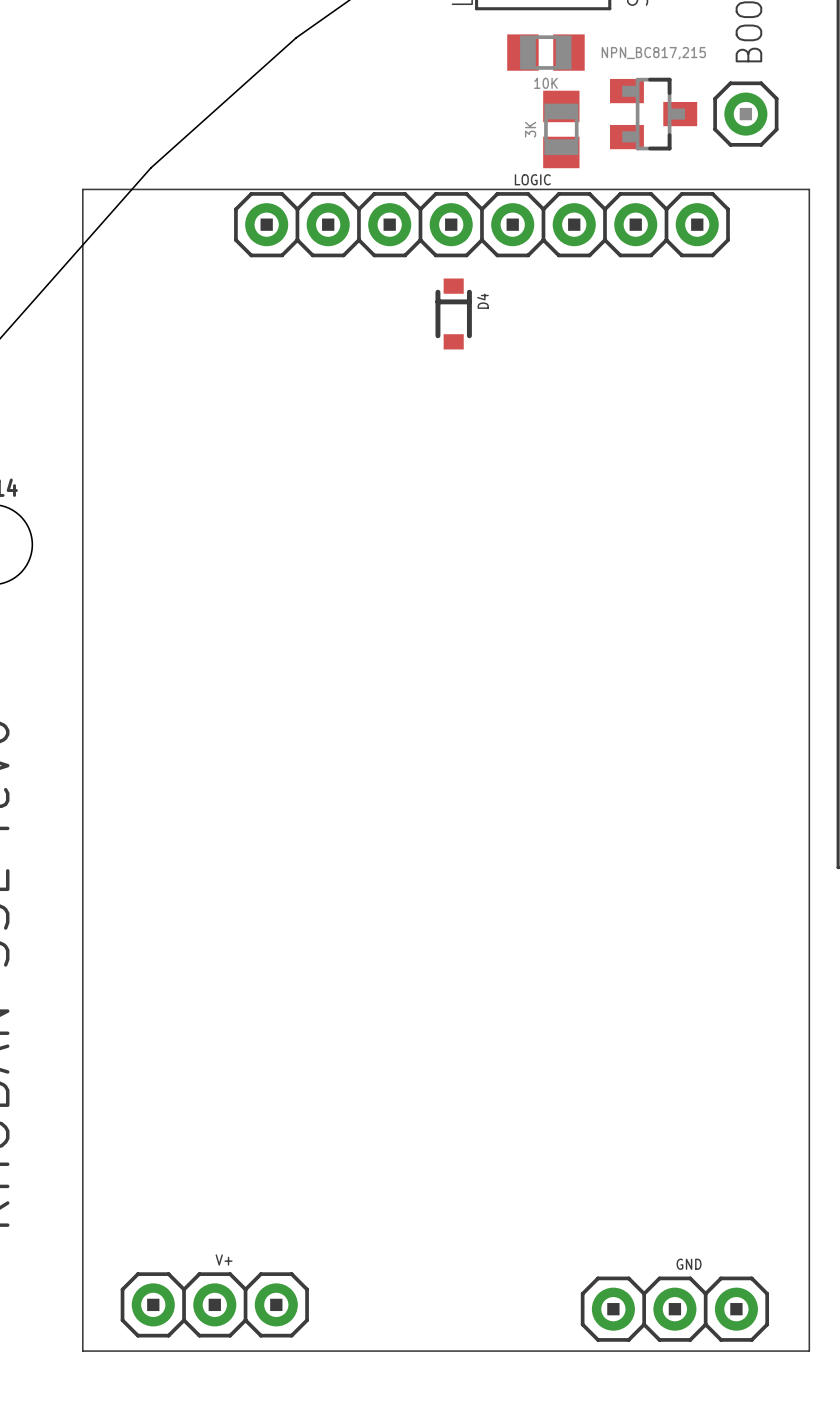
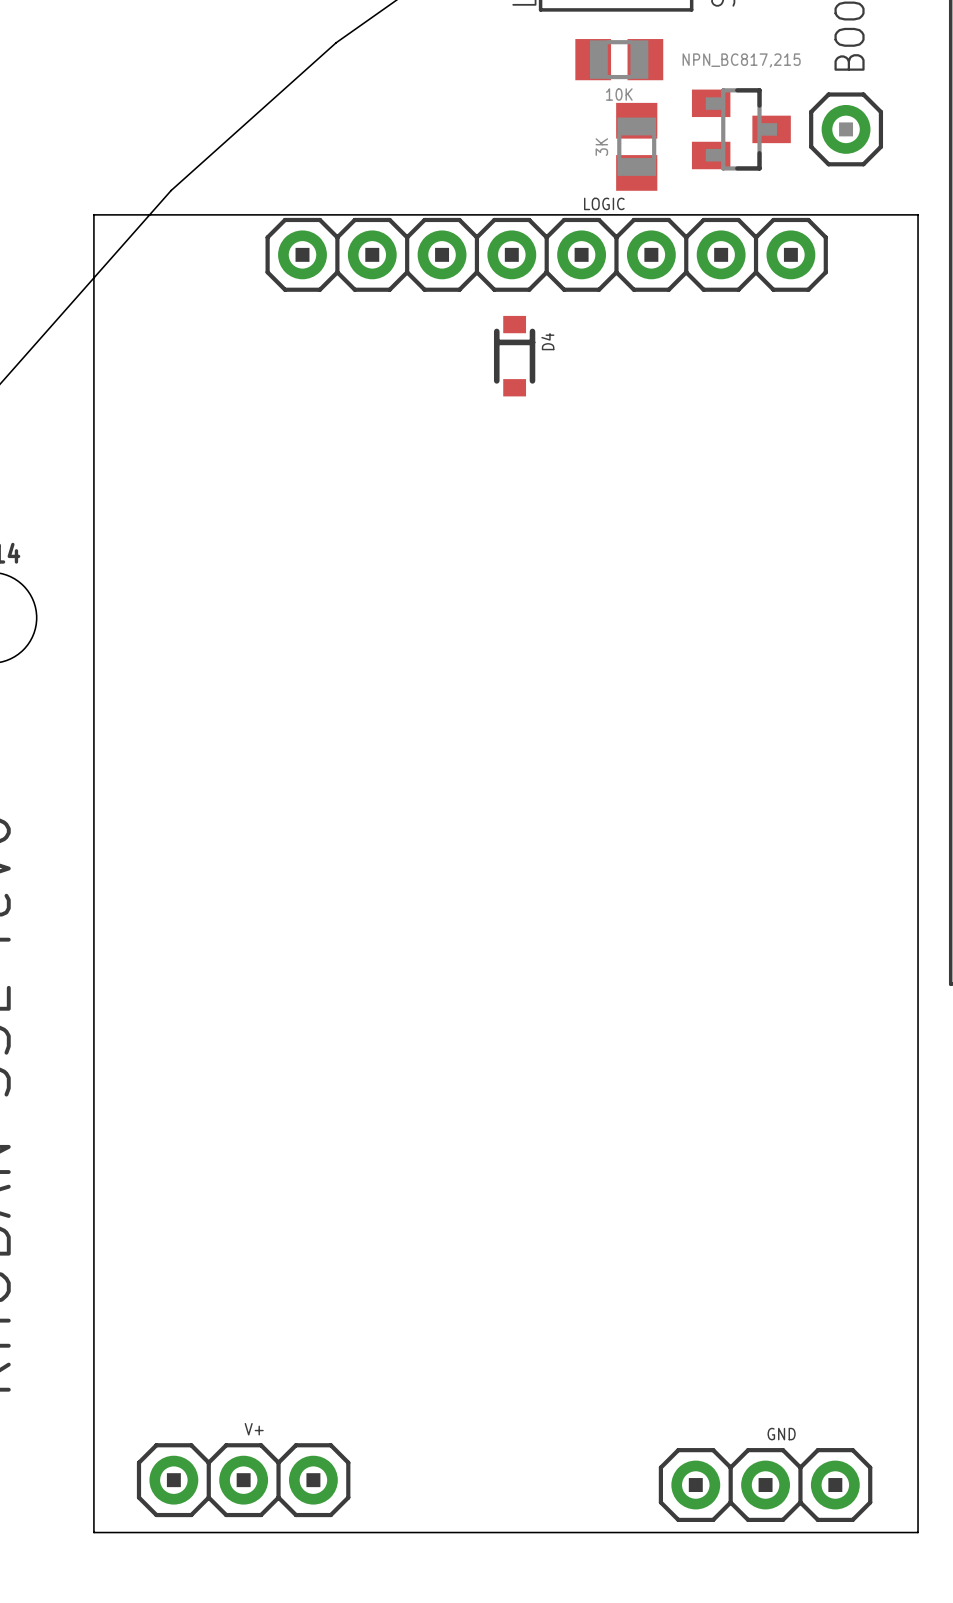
part footprint: [82, 189, 810, 1352] -> [93, 214, 919, 1533]

